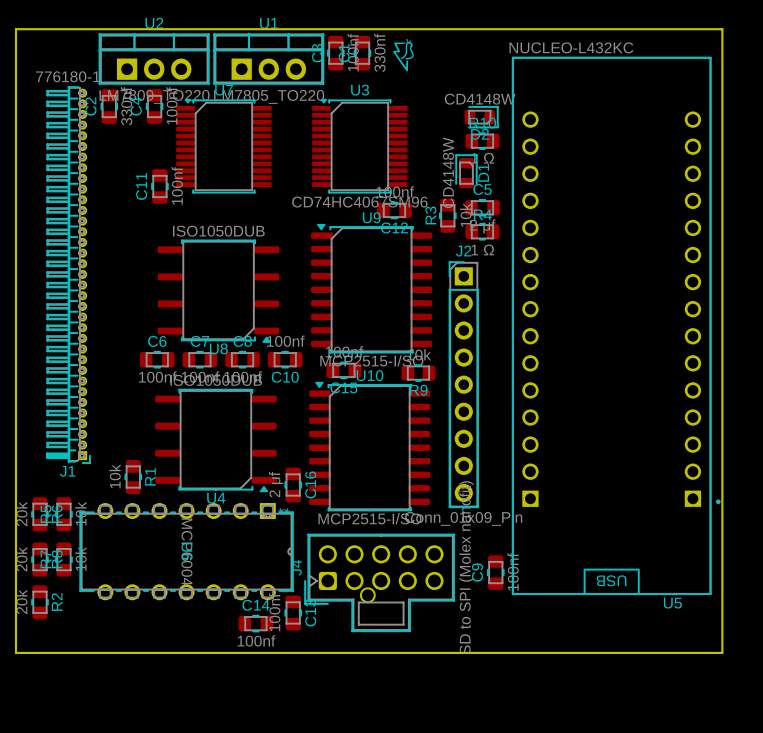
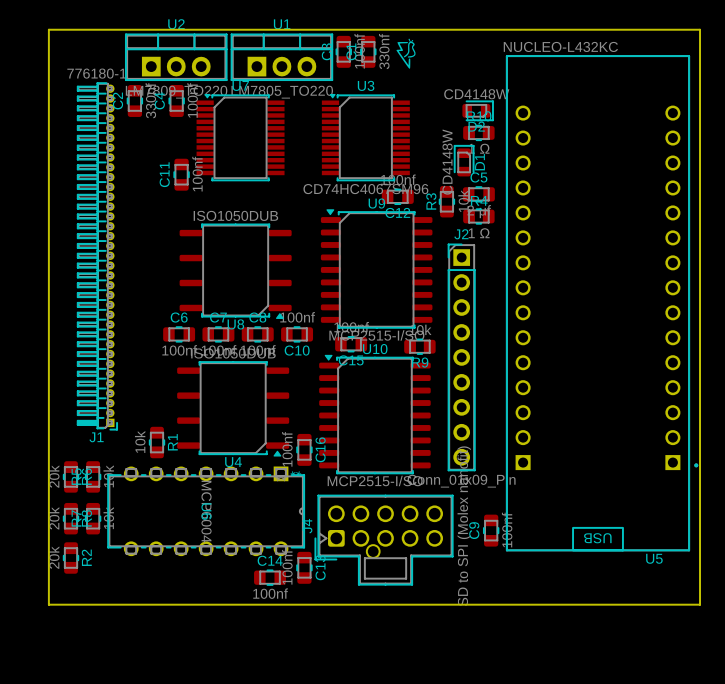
C16 value: 2 μf (276, 484) -> 100nf (287, 449)

